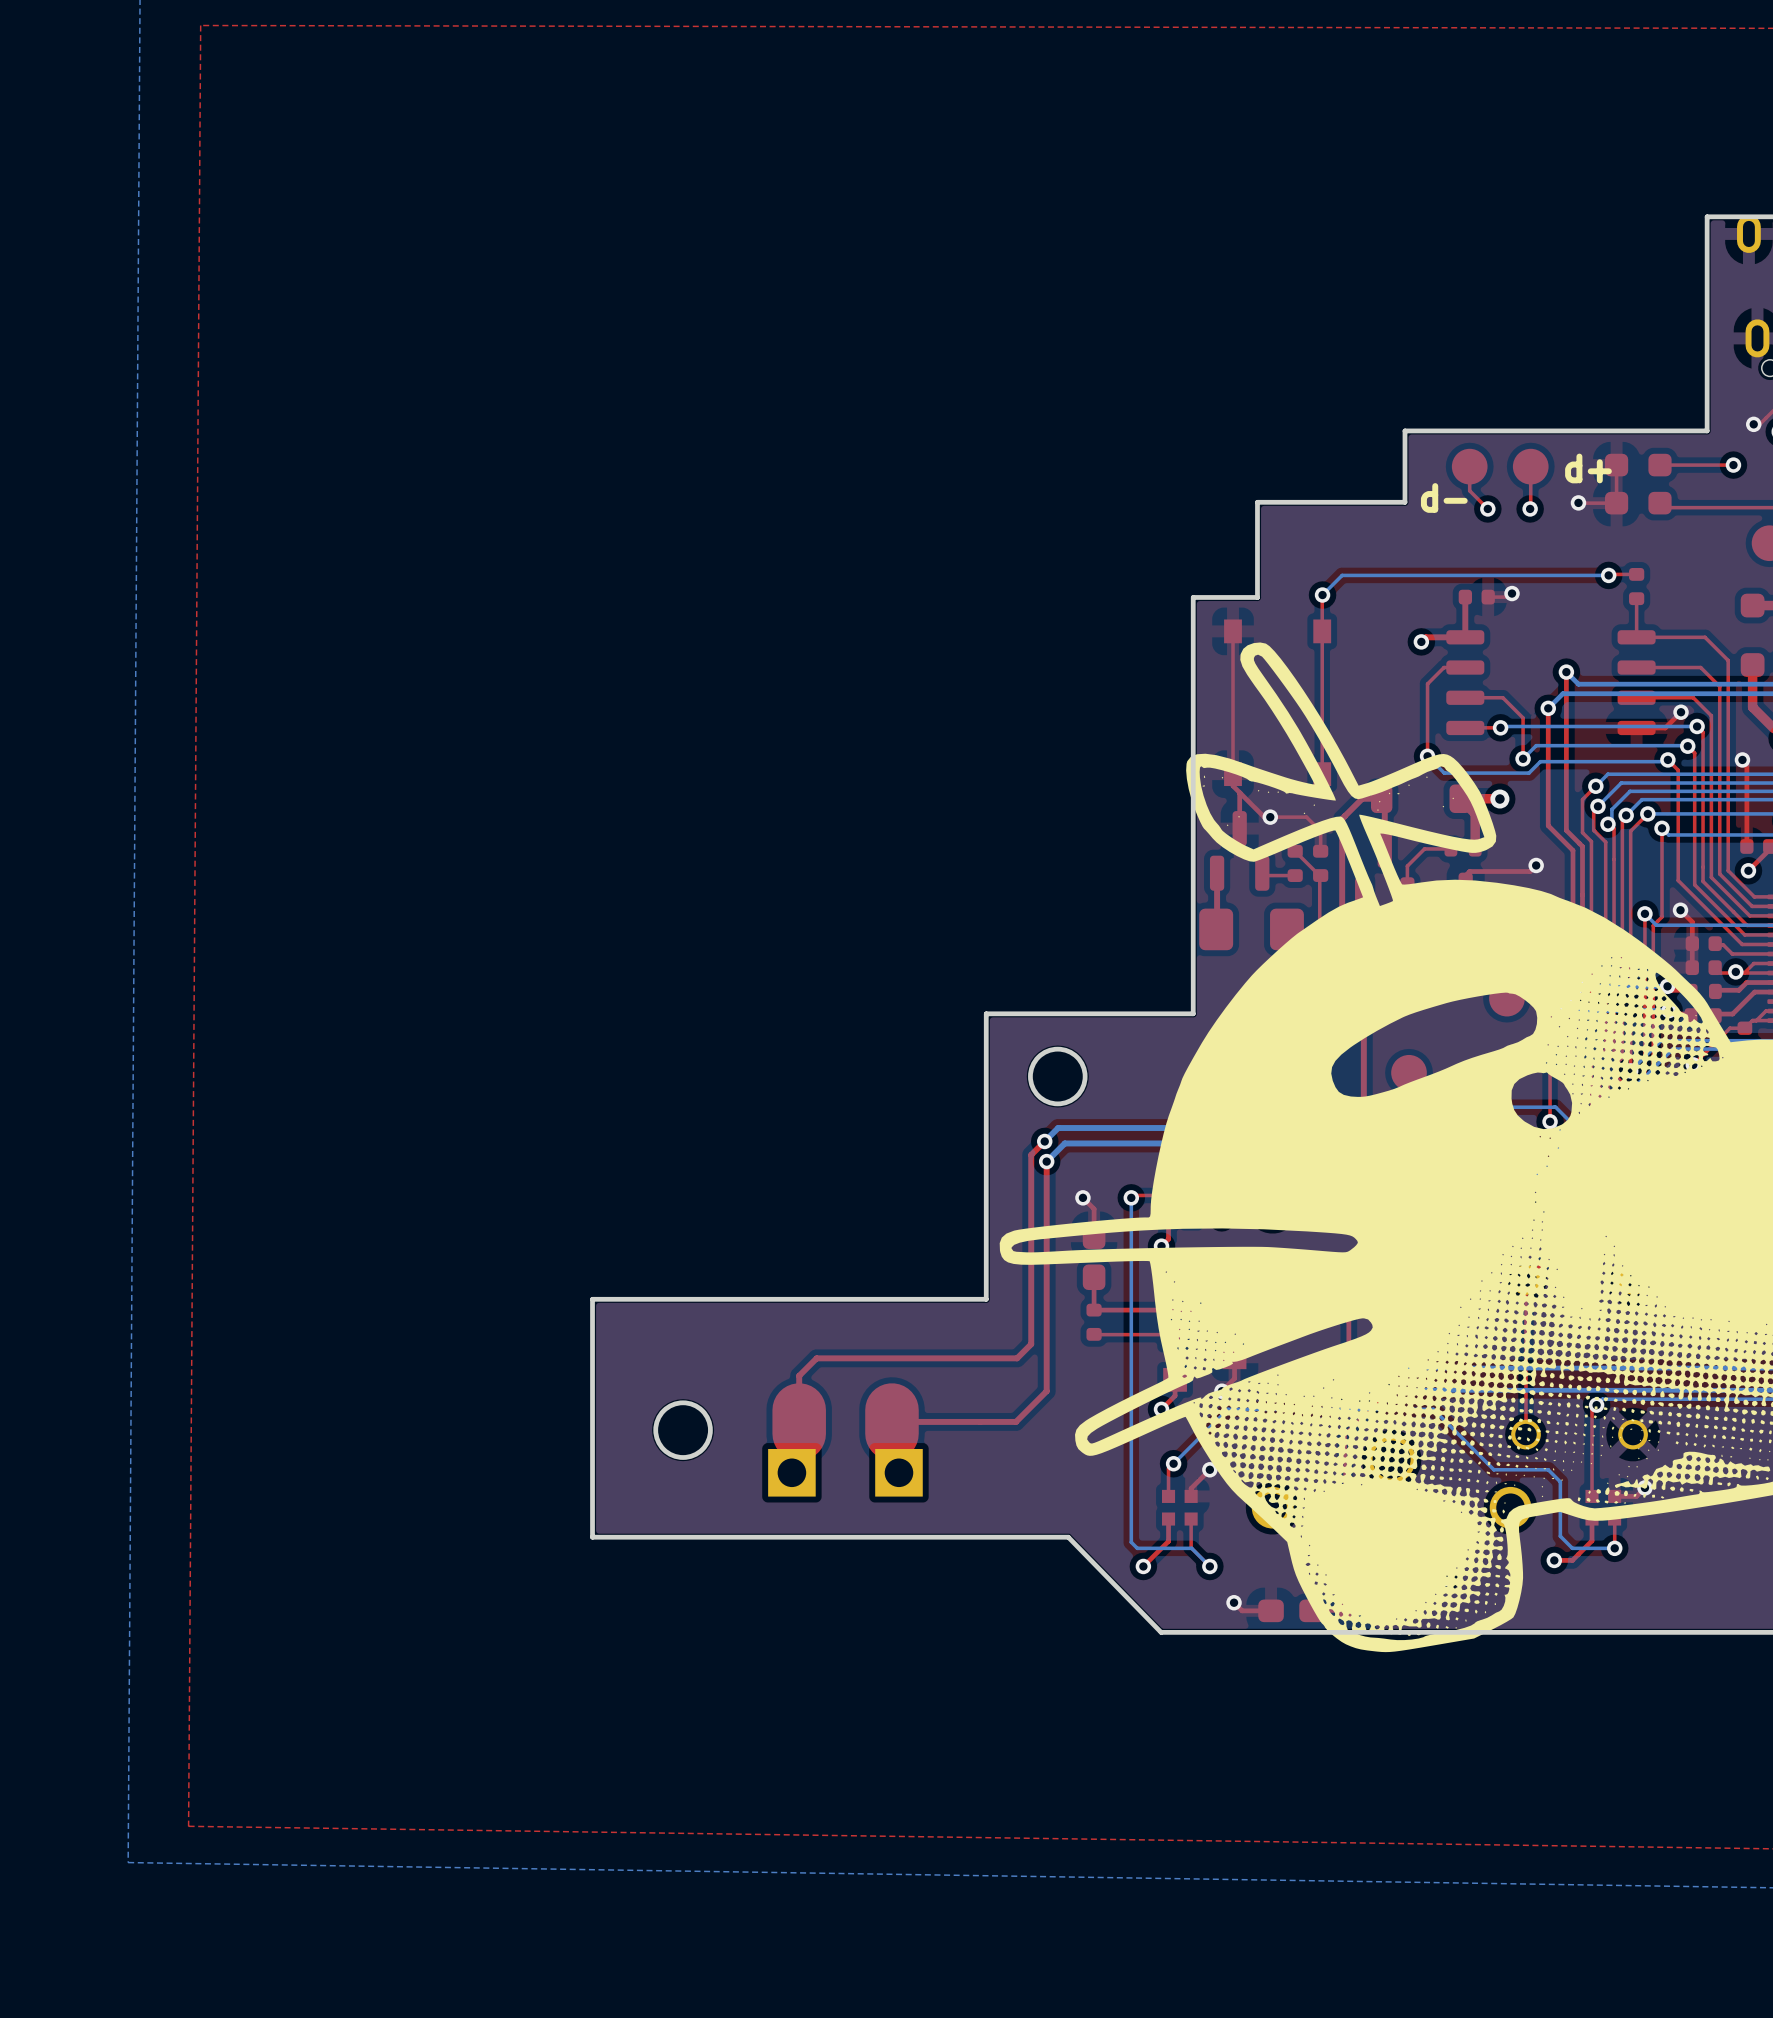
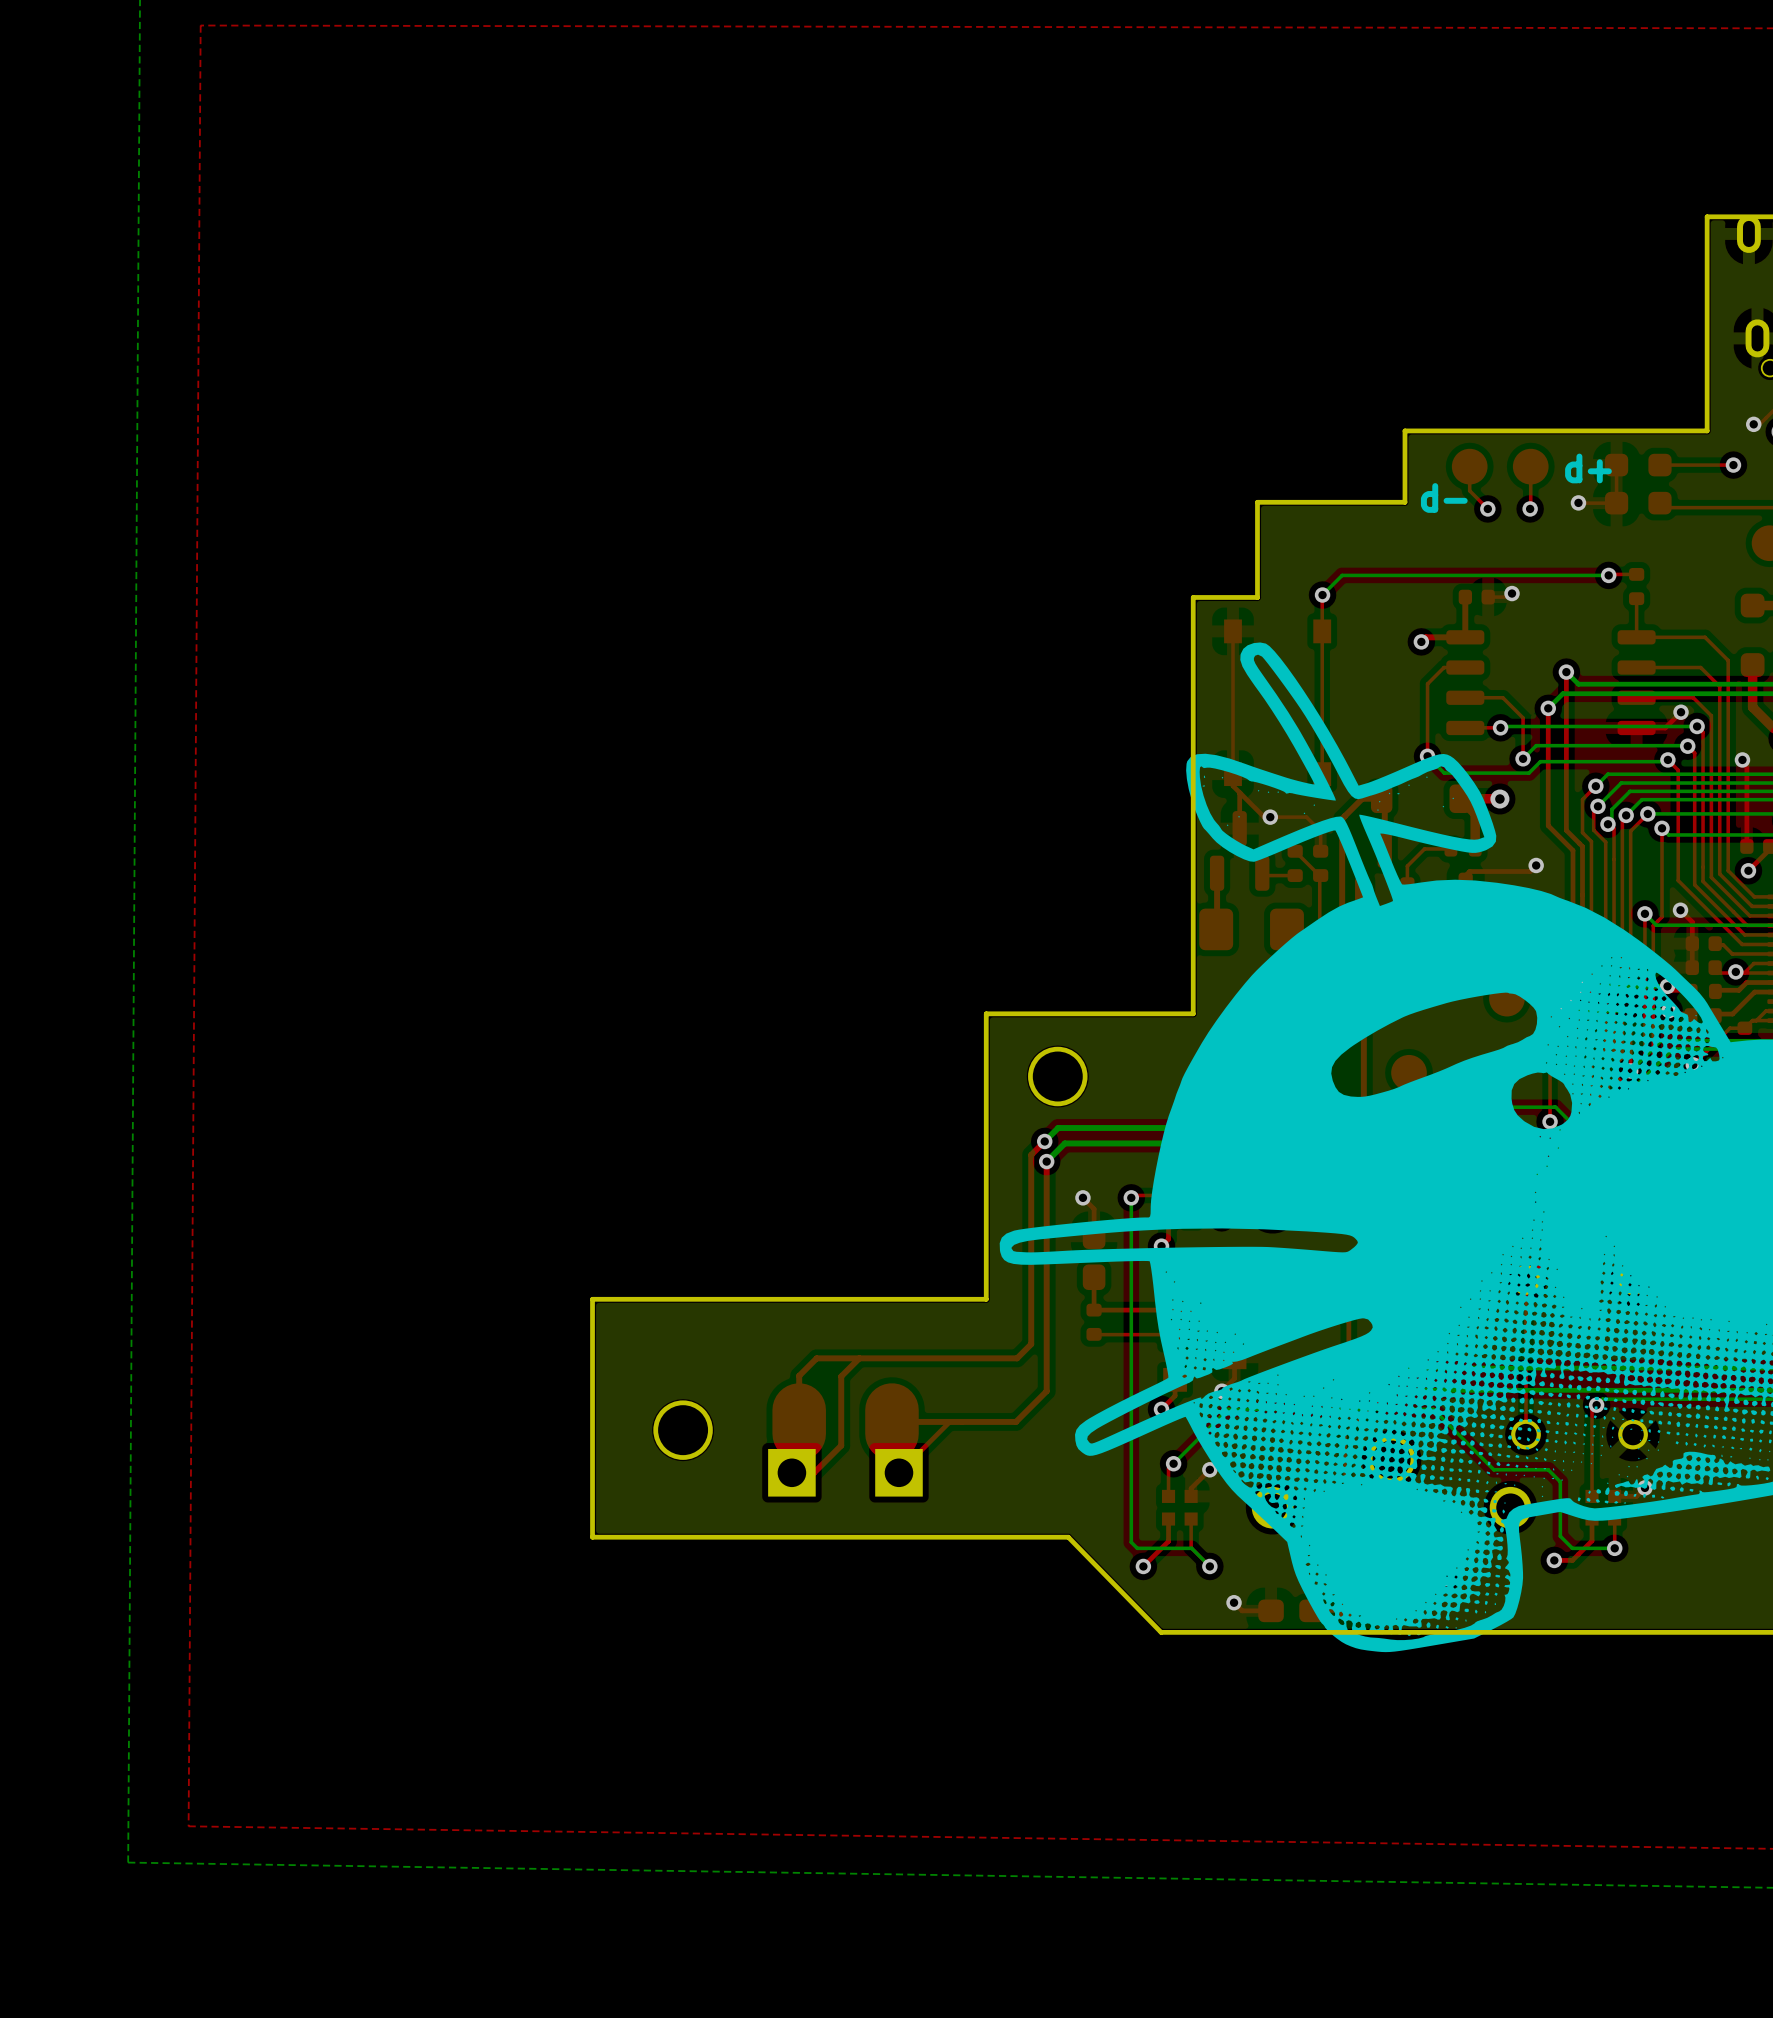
top track: none -> (859, 1358) (841, 1376) (841, 1445) (814, 1472) (791, 1472)
top track: none -> (962, 1421) (949, 1421) (898, 1472)

